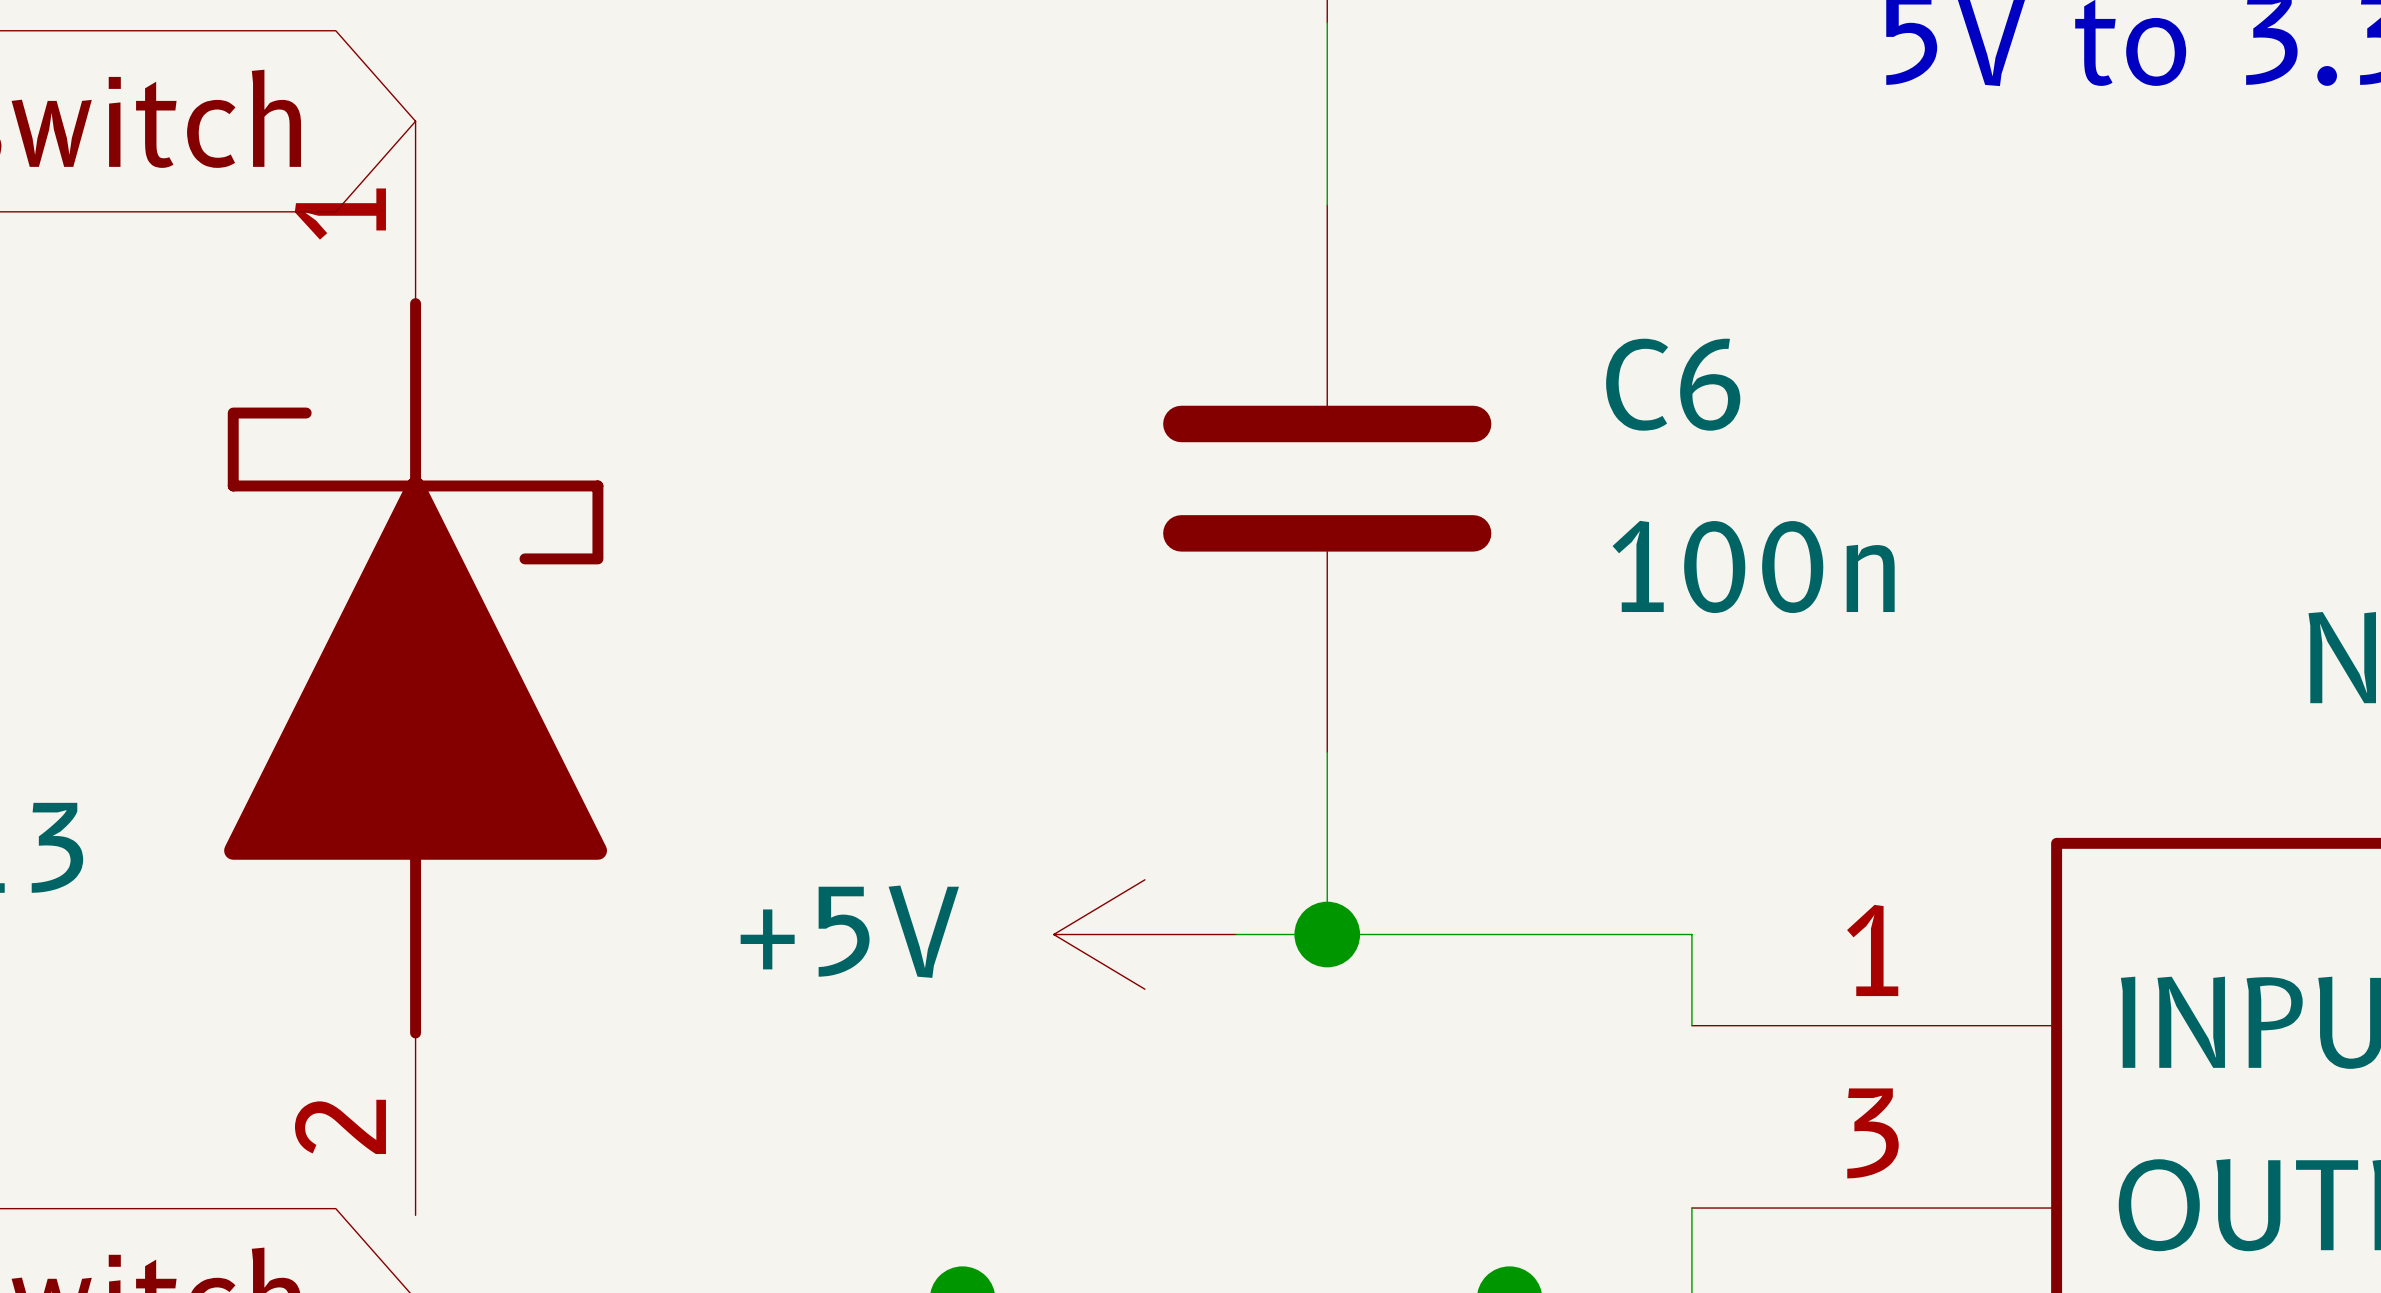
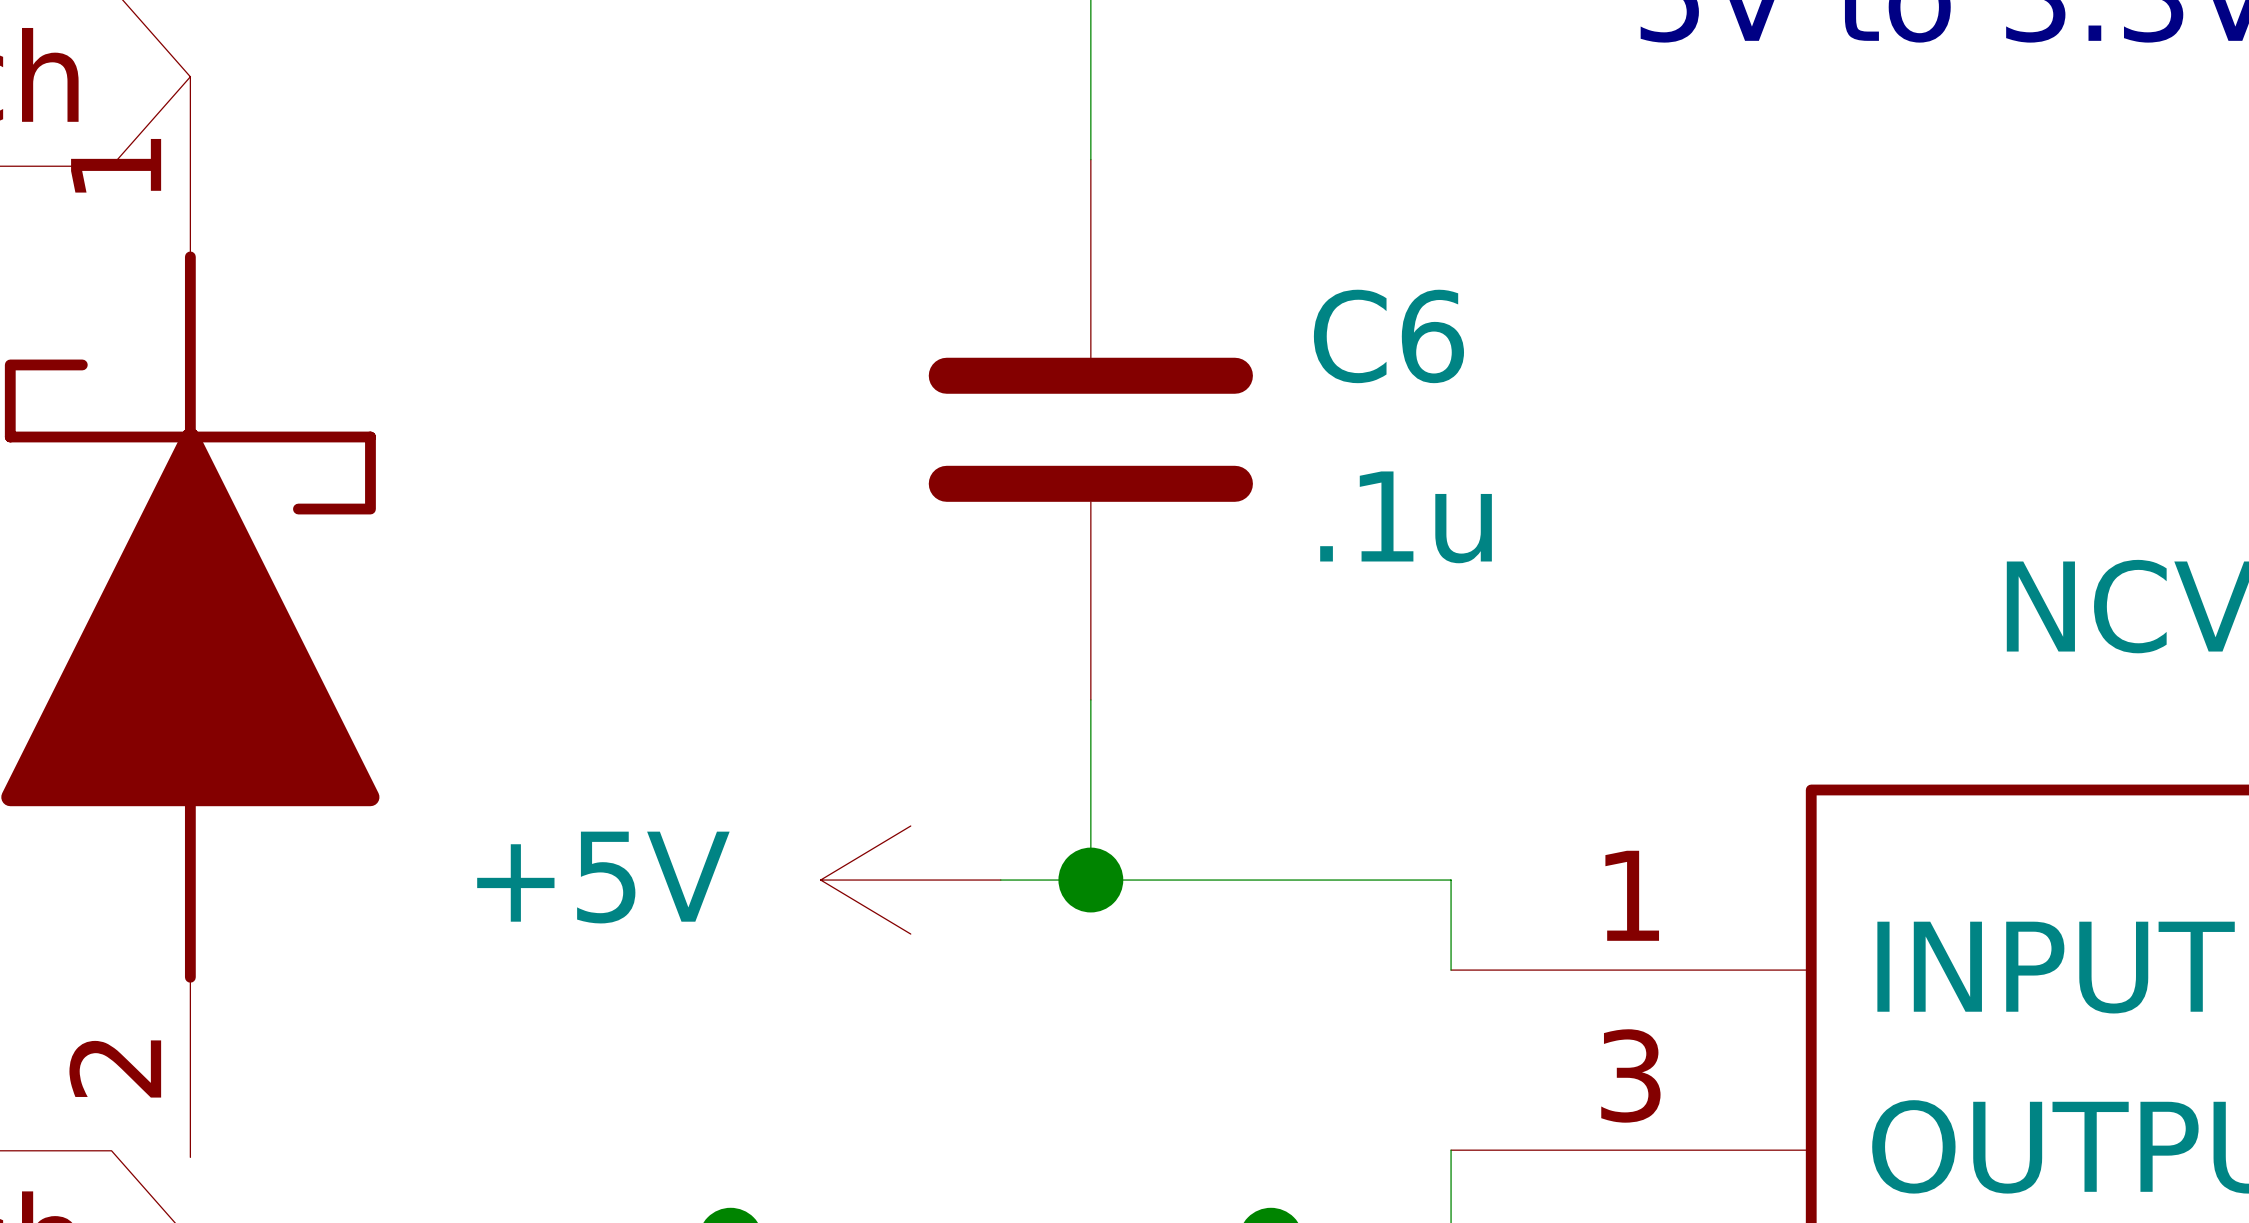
C6 name position: C6 (1673, 384) -> C6 (1388, 336)
C6 value: 100n (1753, 566) -> .1u (1406, 517)

